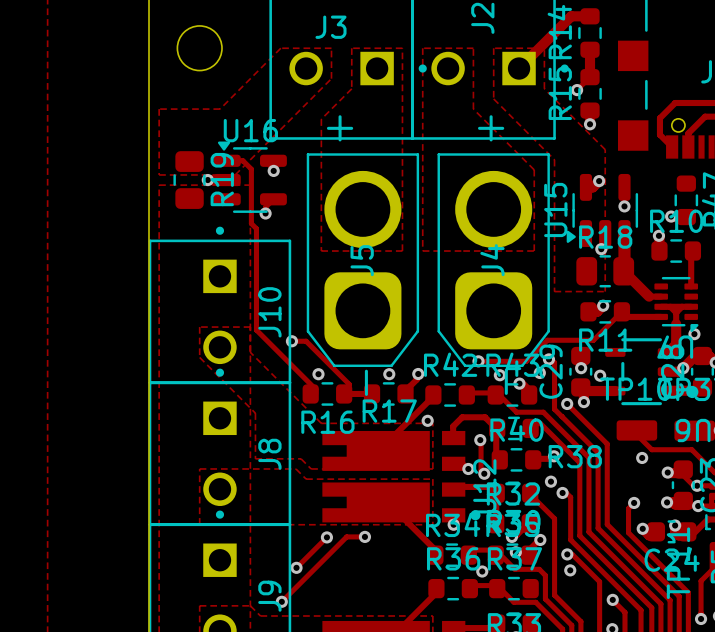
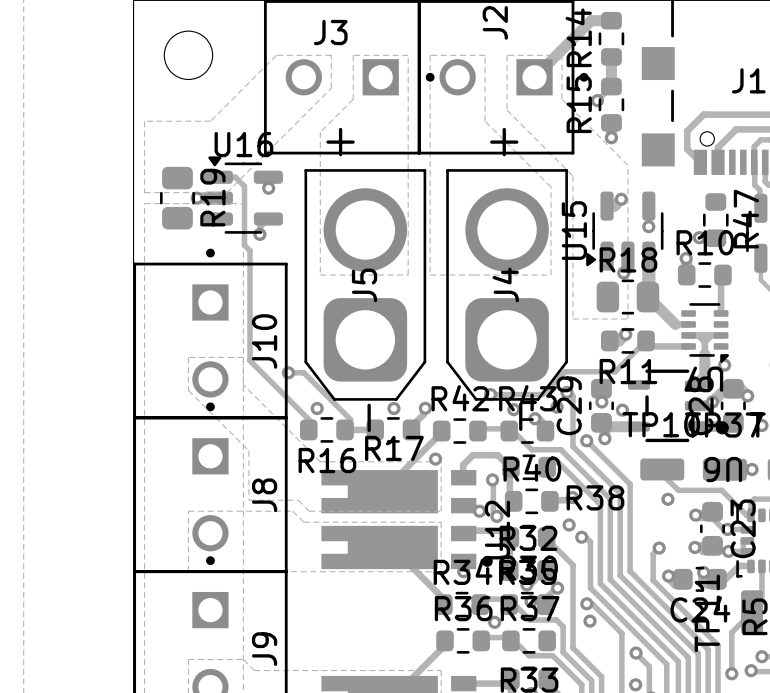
track: (364, 536) (346, 536) (281, 601) -> none
via: (364, 536) -> none
track: (326, 537) (296, 567) -> none
via: (326, 537) -> none
via: (296, 567) -> none
via: (281, 601) -> none

